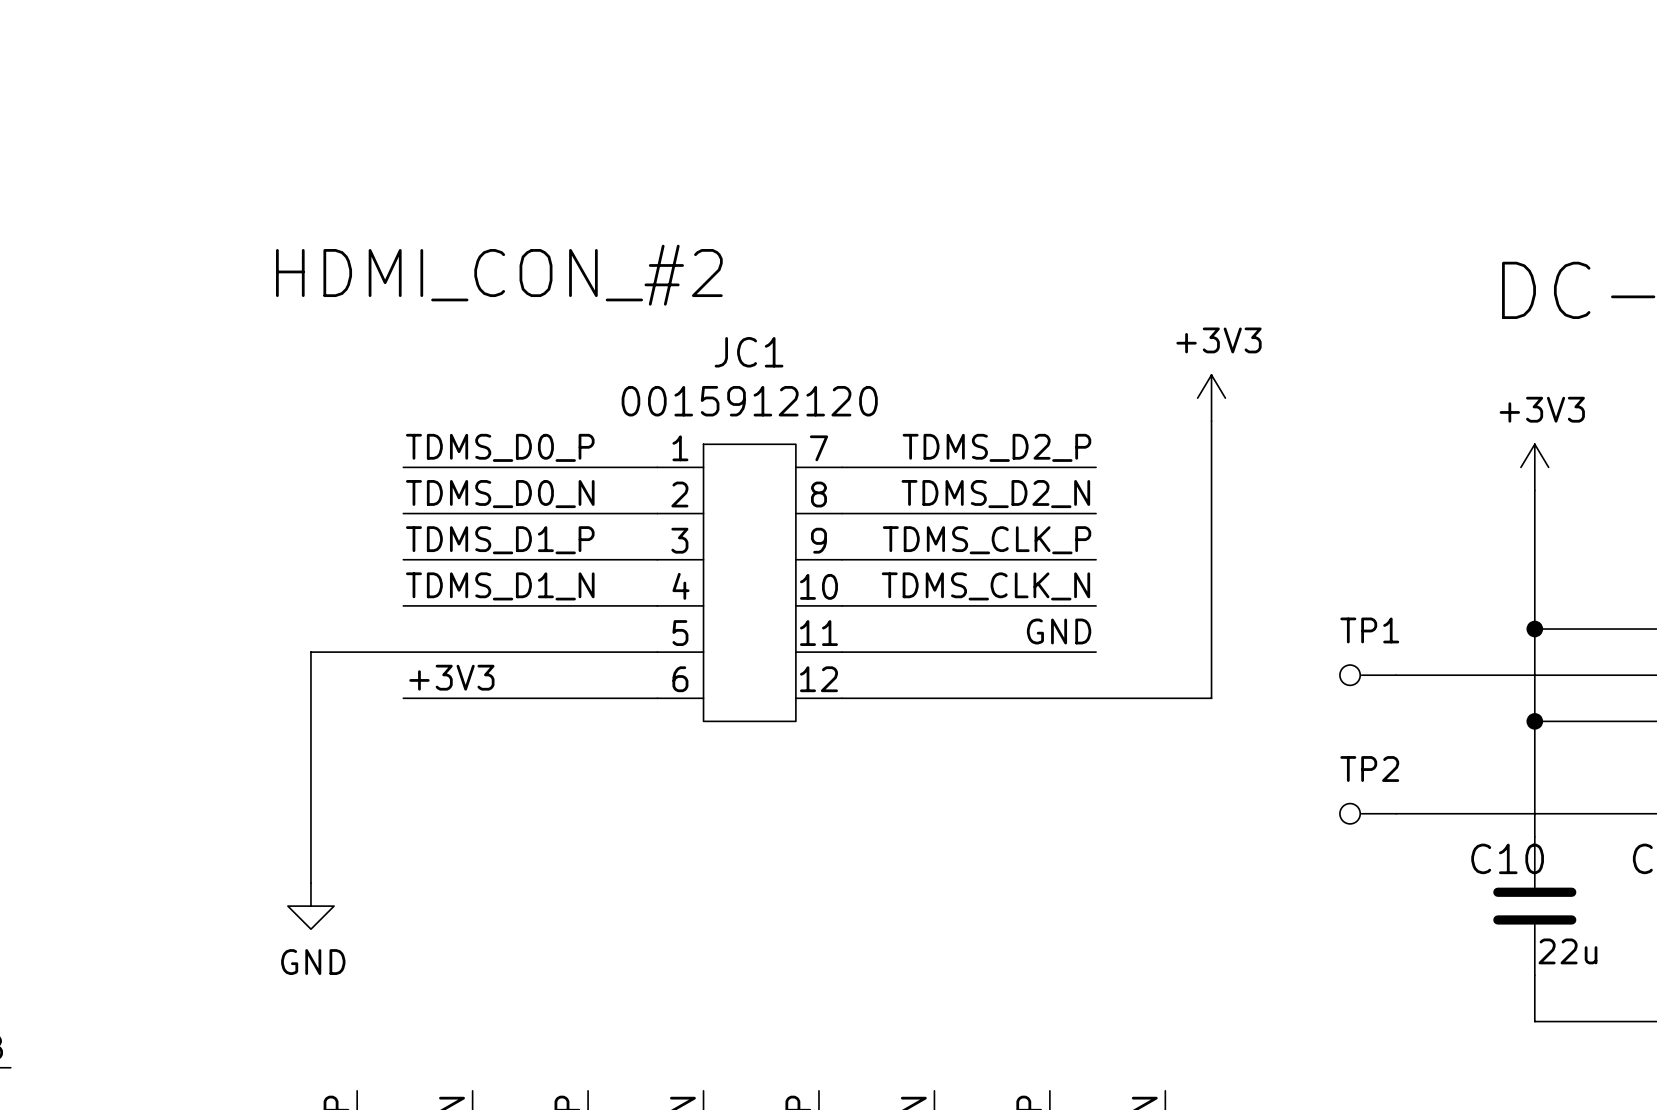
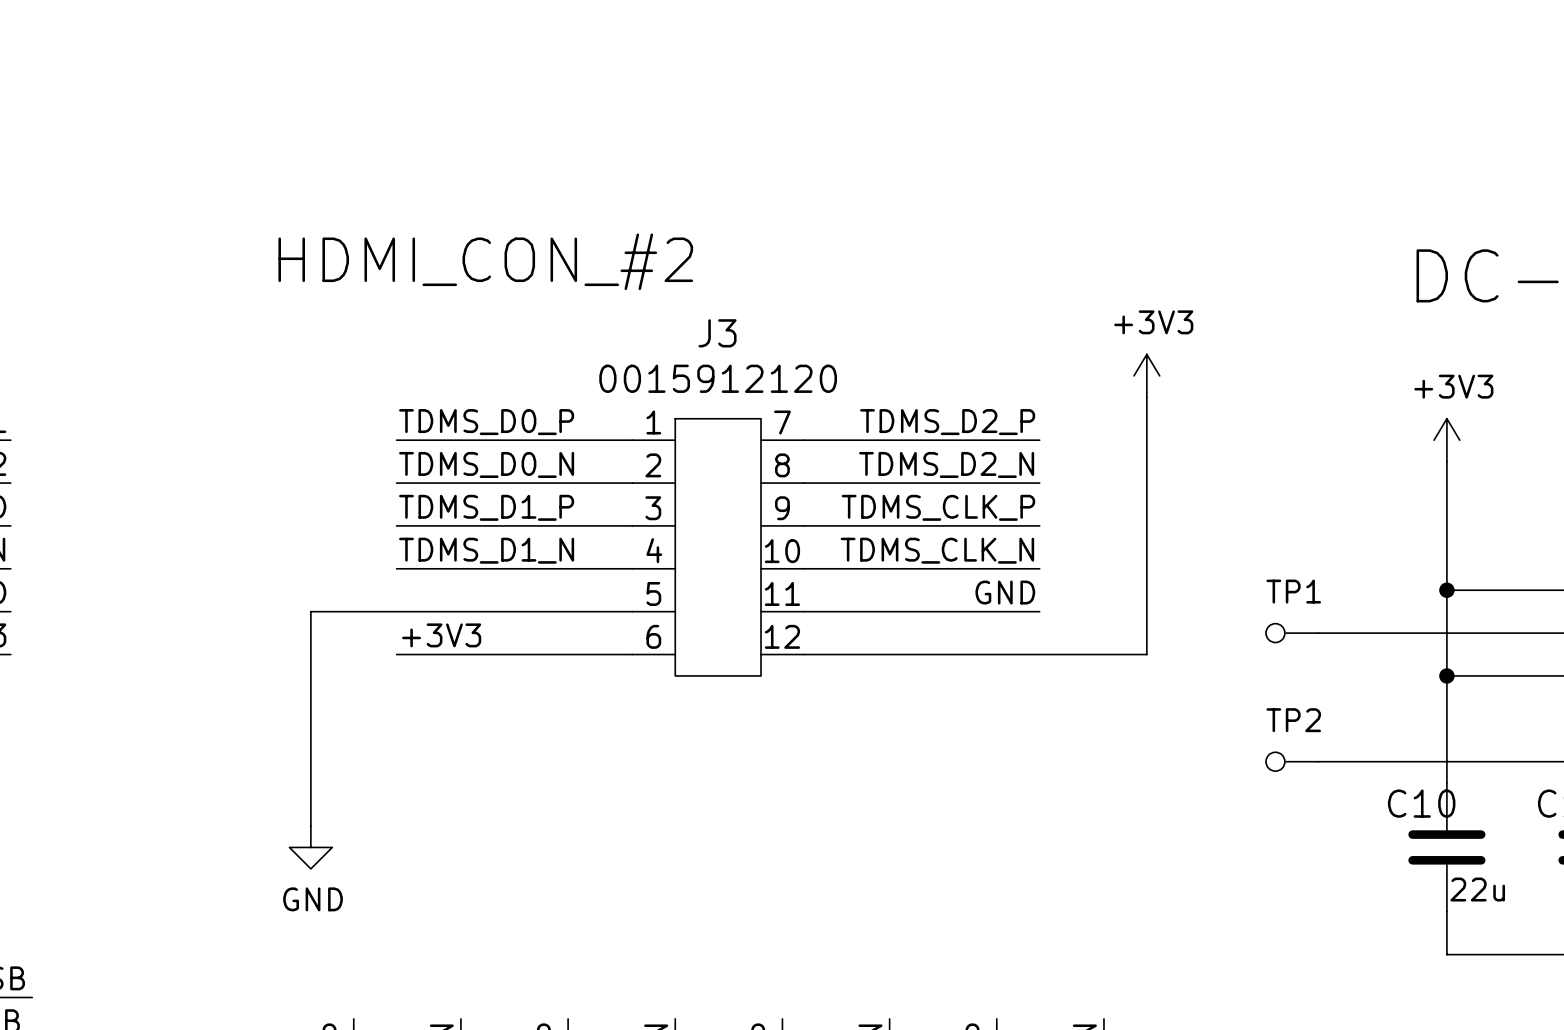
JC1 name: JC1 (749, 352) -> J3 (717, 333)

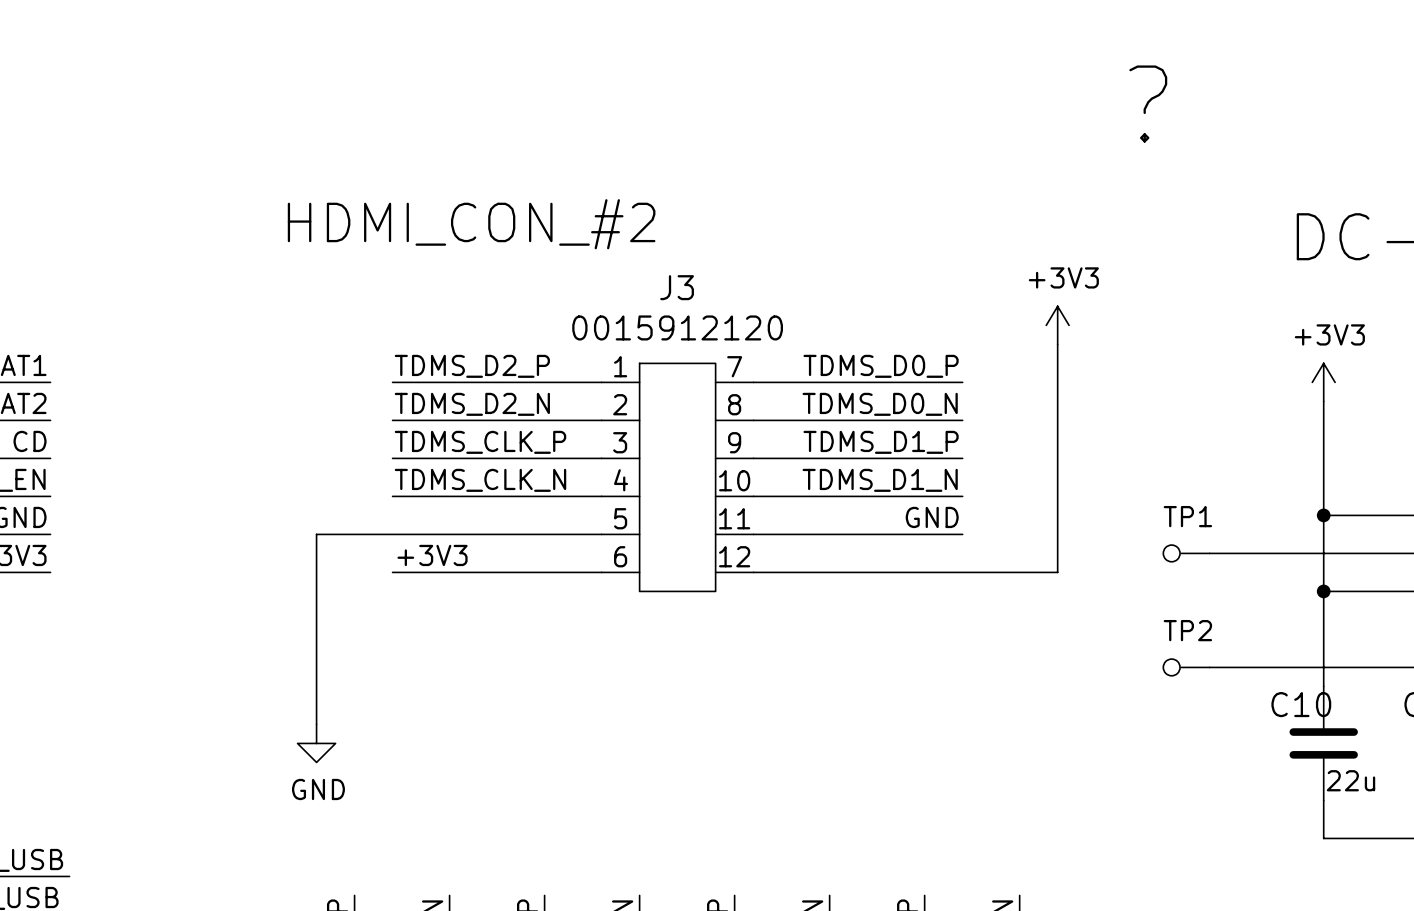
text: none -> ? (1148, 104)
label: TDMS_D0_P (486, 422) -> TDMS_D2_P (472, 366)
label: TDMS_D2_P (947, 422) -> TDMS_D0_P (881, 366)
label: TDMS_D0_N (486, 464) -> TDMS_D2_N (472, 404)
label: TDMS_D2_N (946, 464) -> TDMS_D0_N (880, 404)
label: TDMS_D1_P (486, 507) -> TDMS_CLK_P (480, 442)
label: TDMS_CLK_P (938, 507) -> TDMS_D1_P (881, 442)
label: TDMS_D1_N (486, 550) -> TDMS_CLK_N (480, 480)
label: TDMS_CLK_N (937, 550) -> TDMS_D1_N (880, 480)

